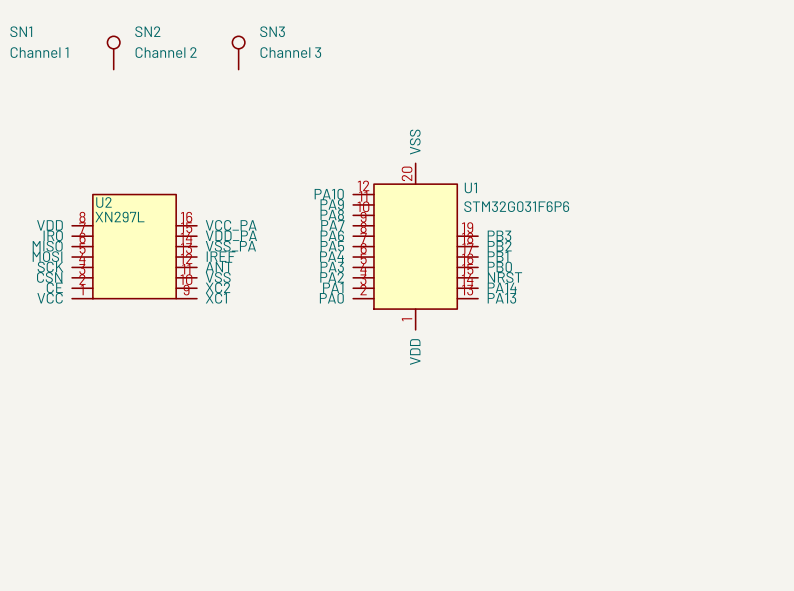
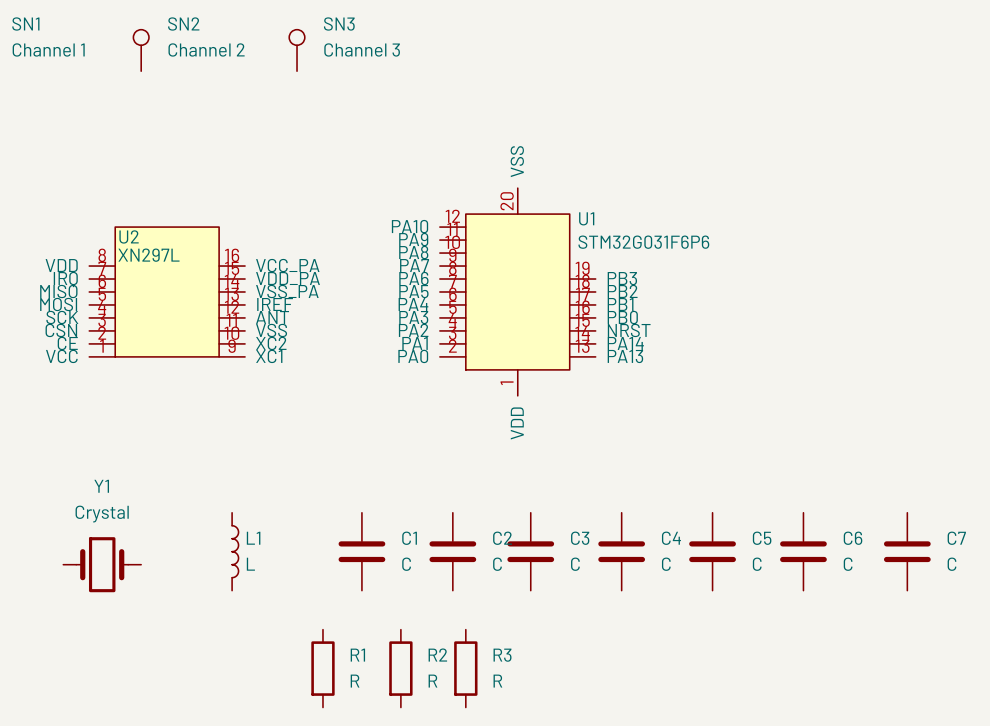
L1: none -> L (235, 551)
C1: none -> C (361, 551)
C2: none -> C (452, 551)
C3: none -> C (530, 551)
C4: none -> C (621, 551)
C5: none -> C (712, 551)
C6: none -> C (803, 551)
C7: none -> C (907, 551)
Y1: none -> Crystal (102, 564)
R1: none -> R (322, 668)
R2: none -> R (400, 668)
R3: none -> R (465, 668)

